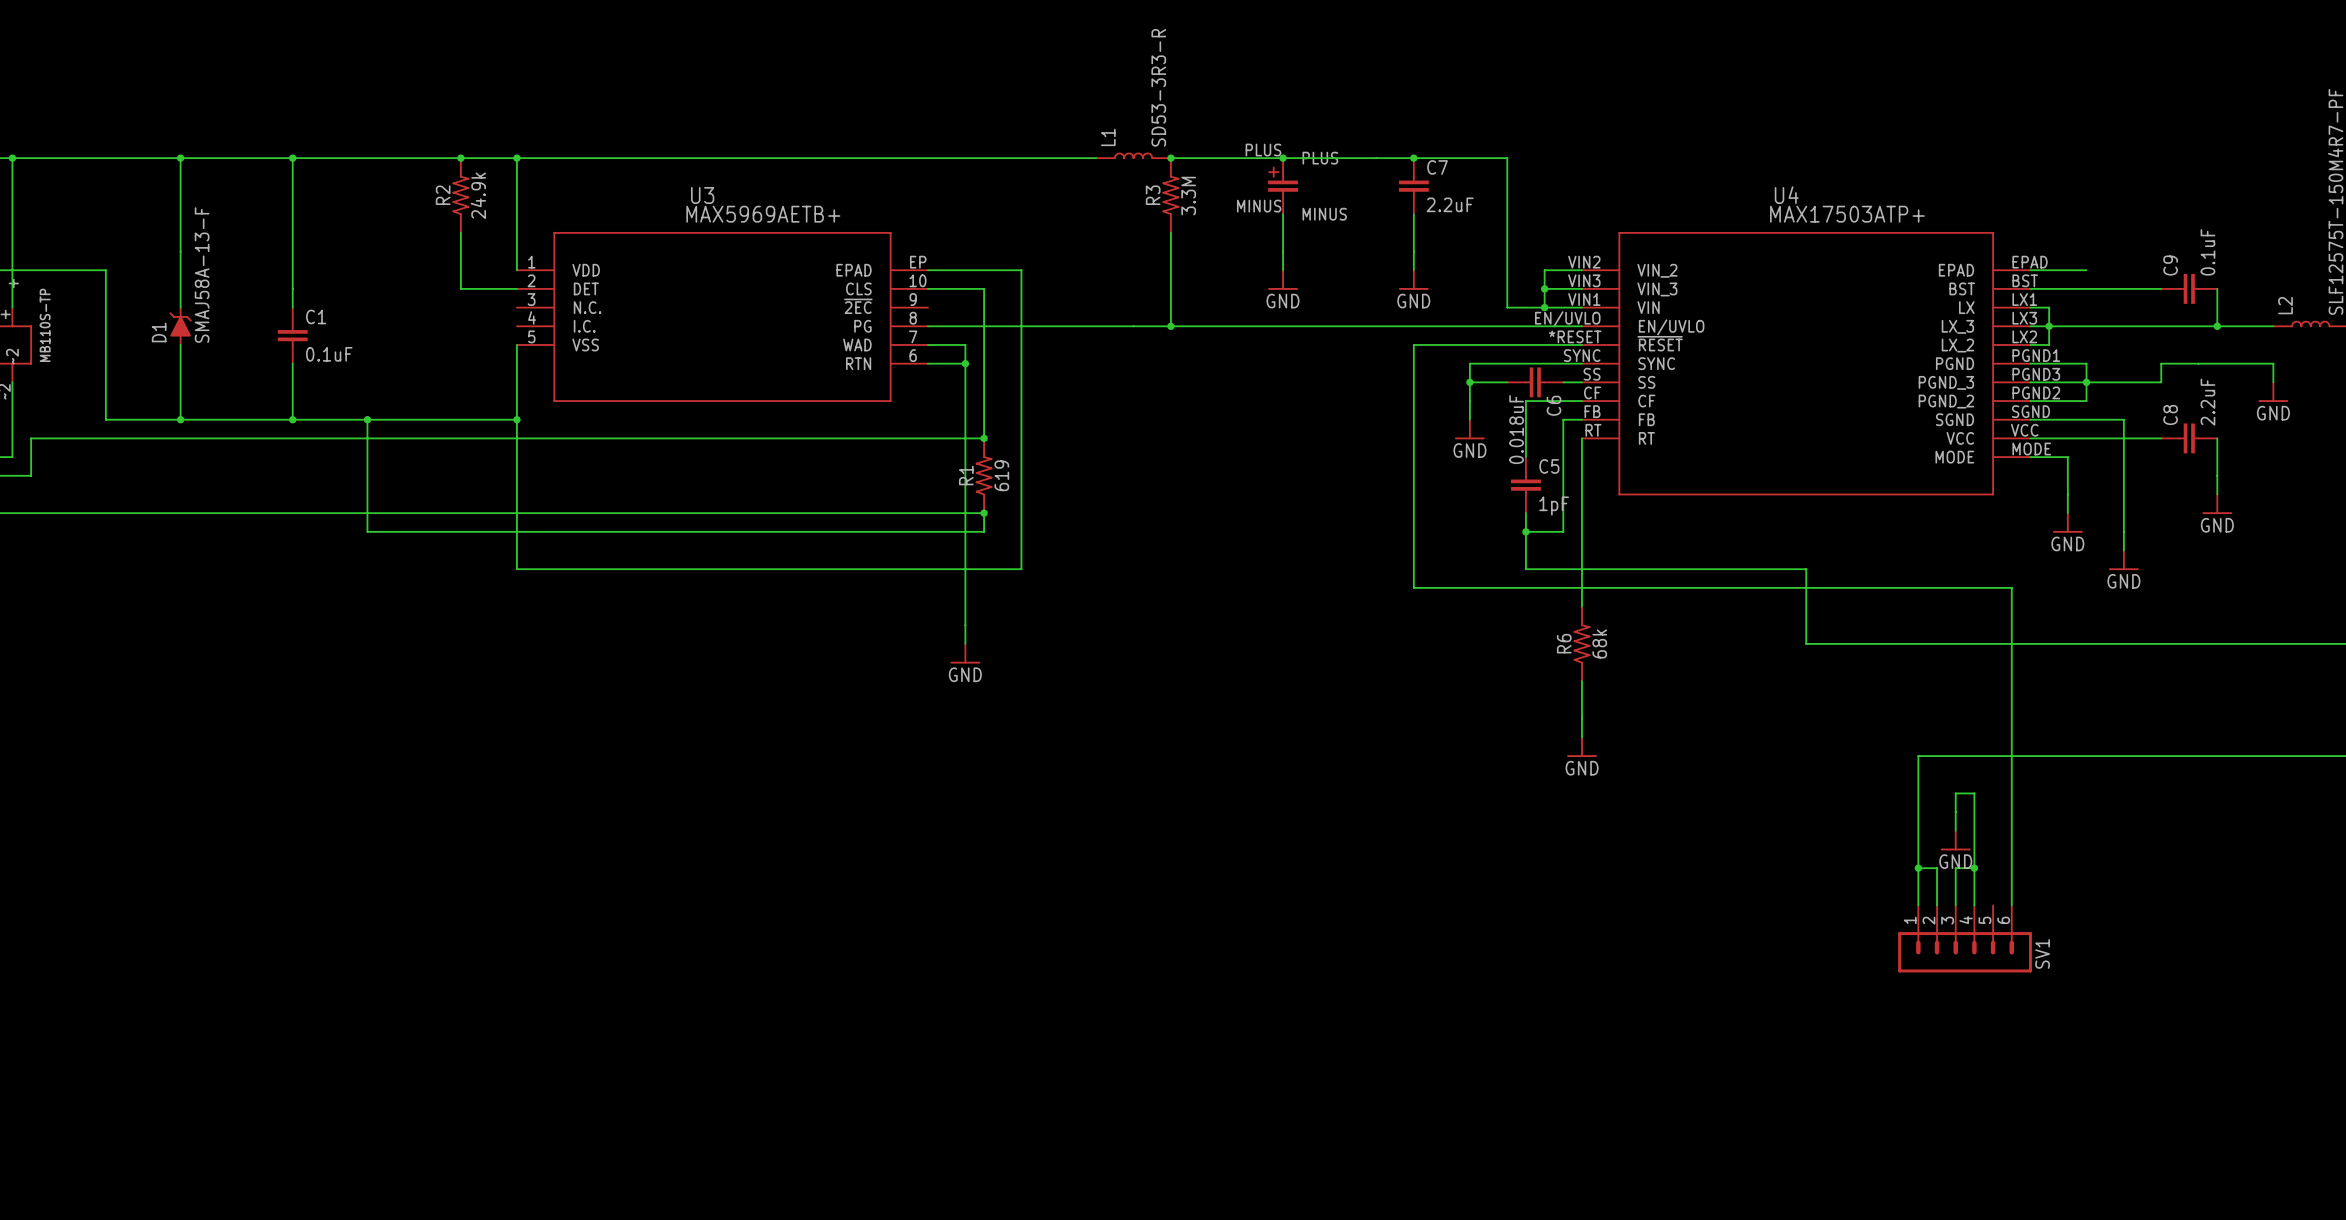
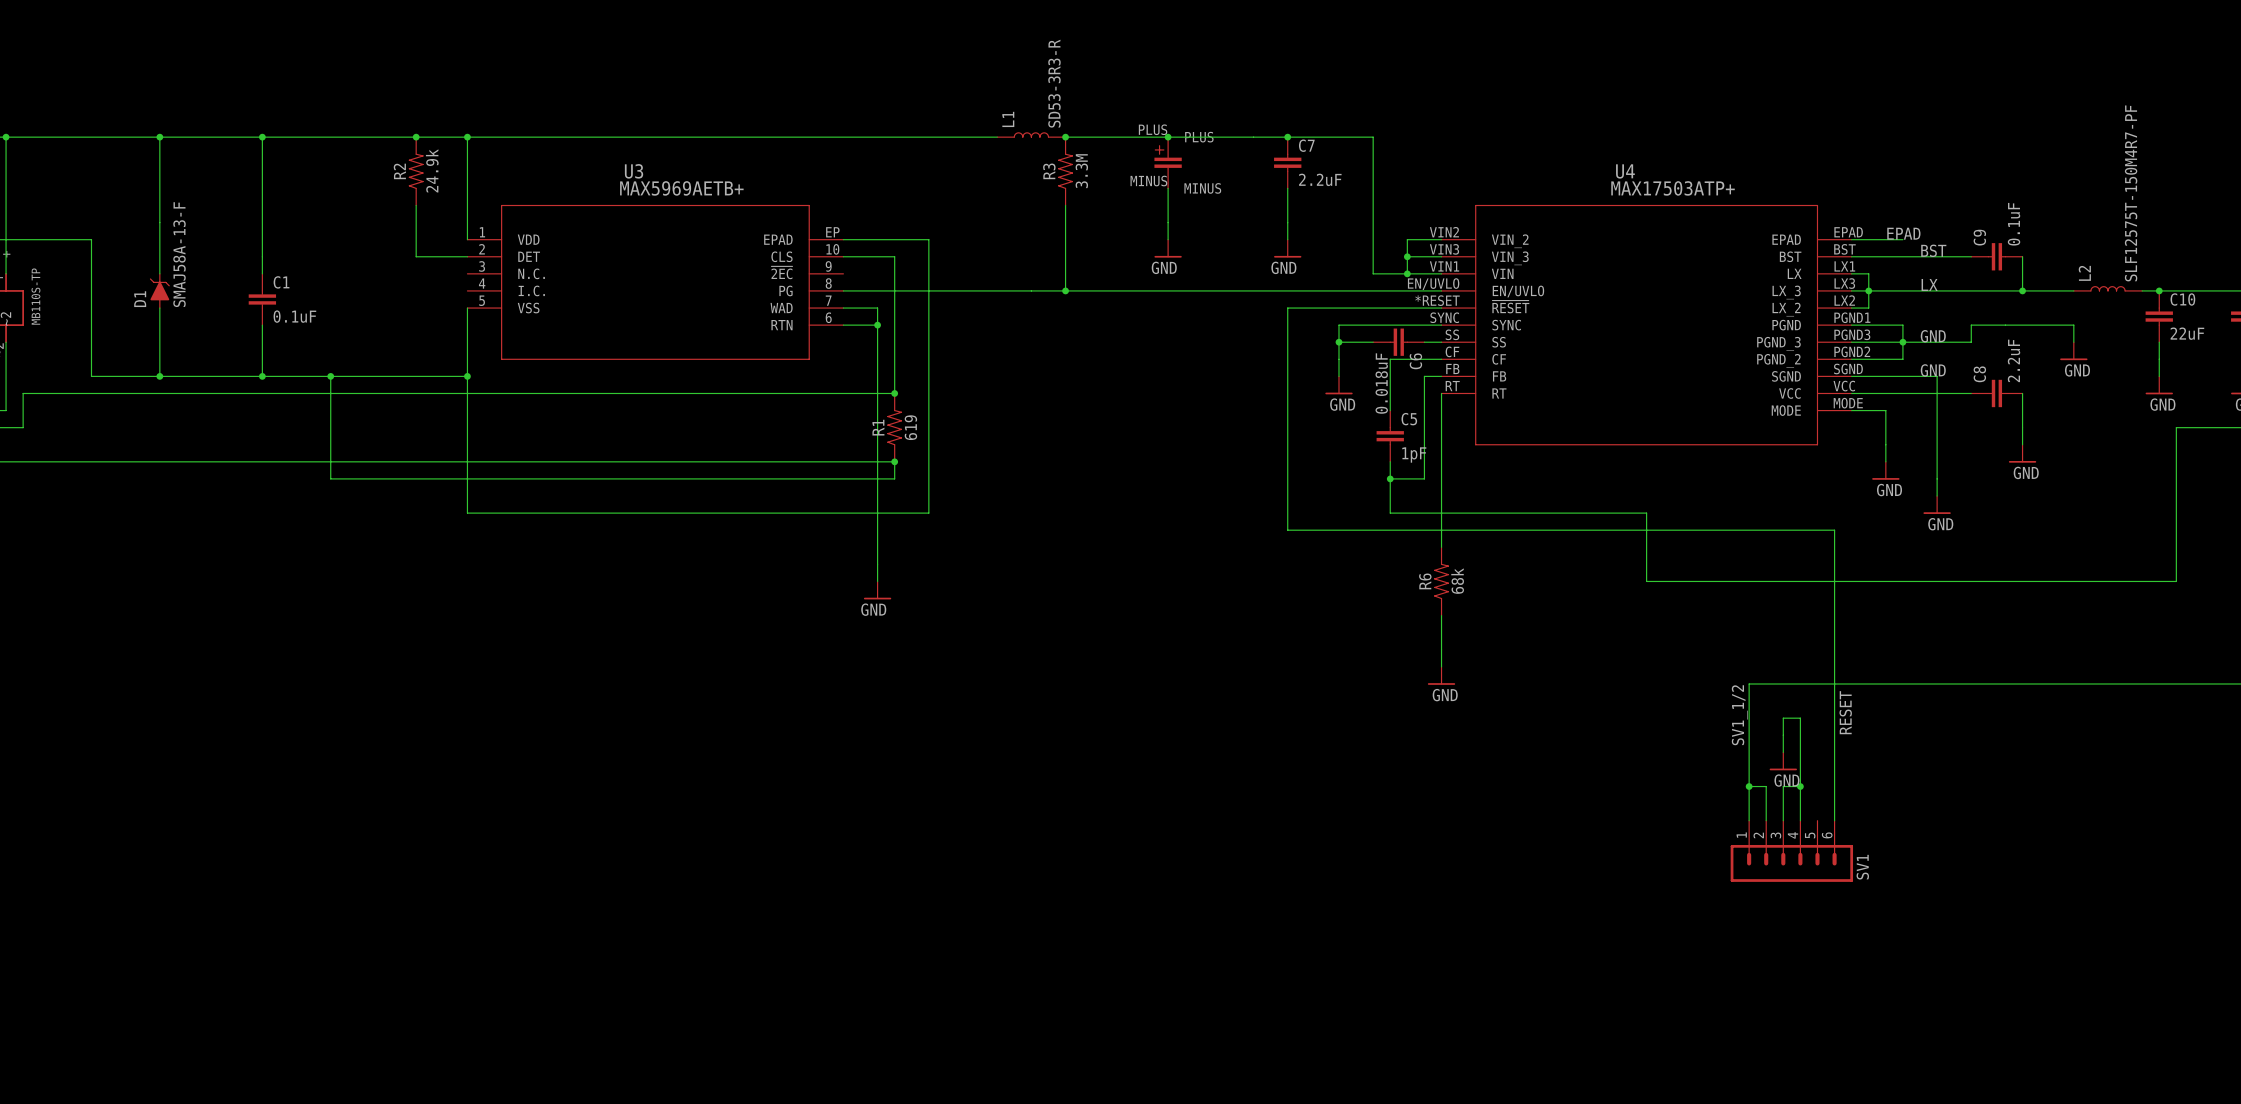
label: none -> EPAD (1903, 233)
label: none -> BST (1933, 250)
label: none -> LX (1929, 284)
label: none -> GND (1933, 336)
label: none -> GND (1933, 370)
label: none -> RESET (1845, 712)
label: none -> SV1_1/2 (1739, 715)

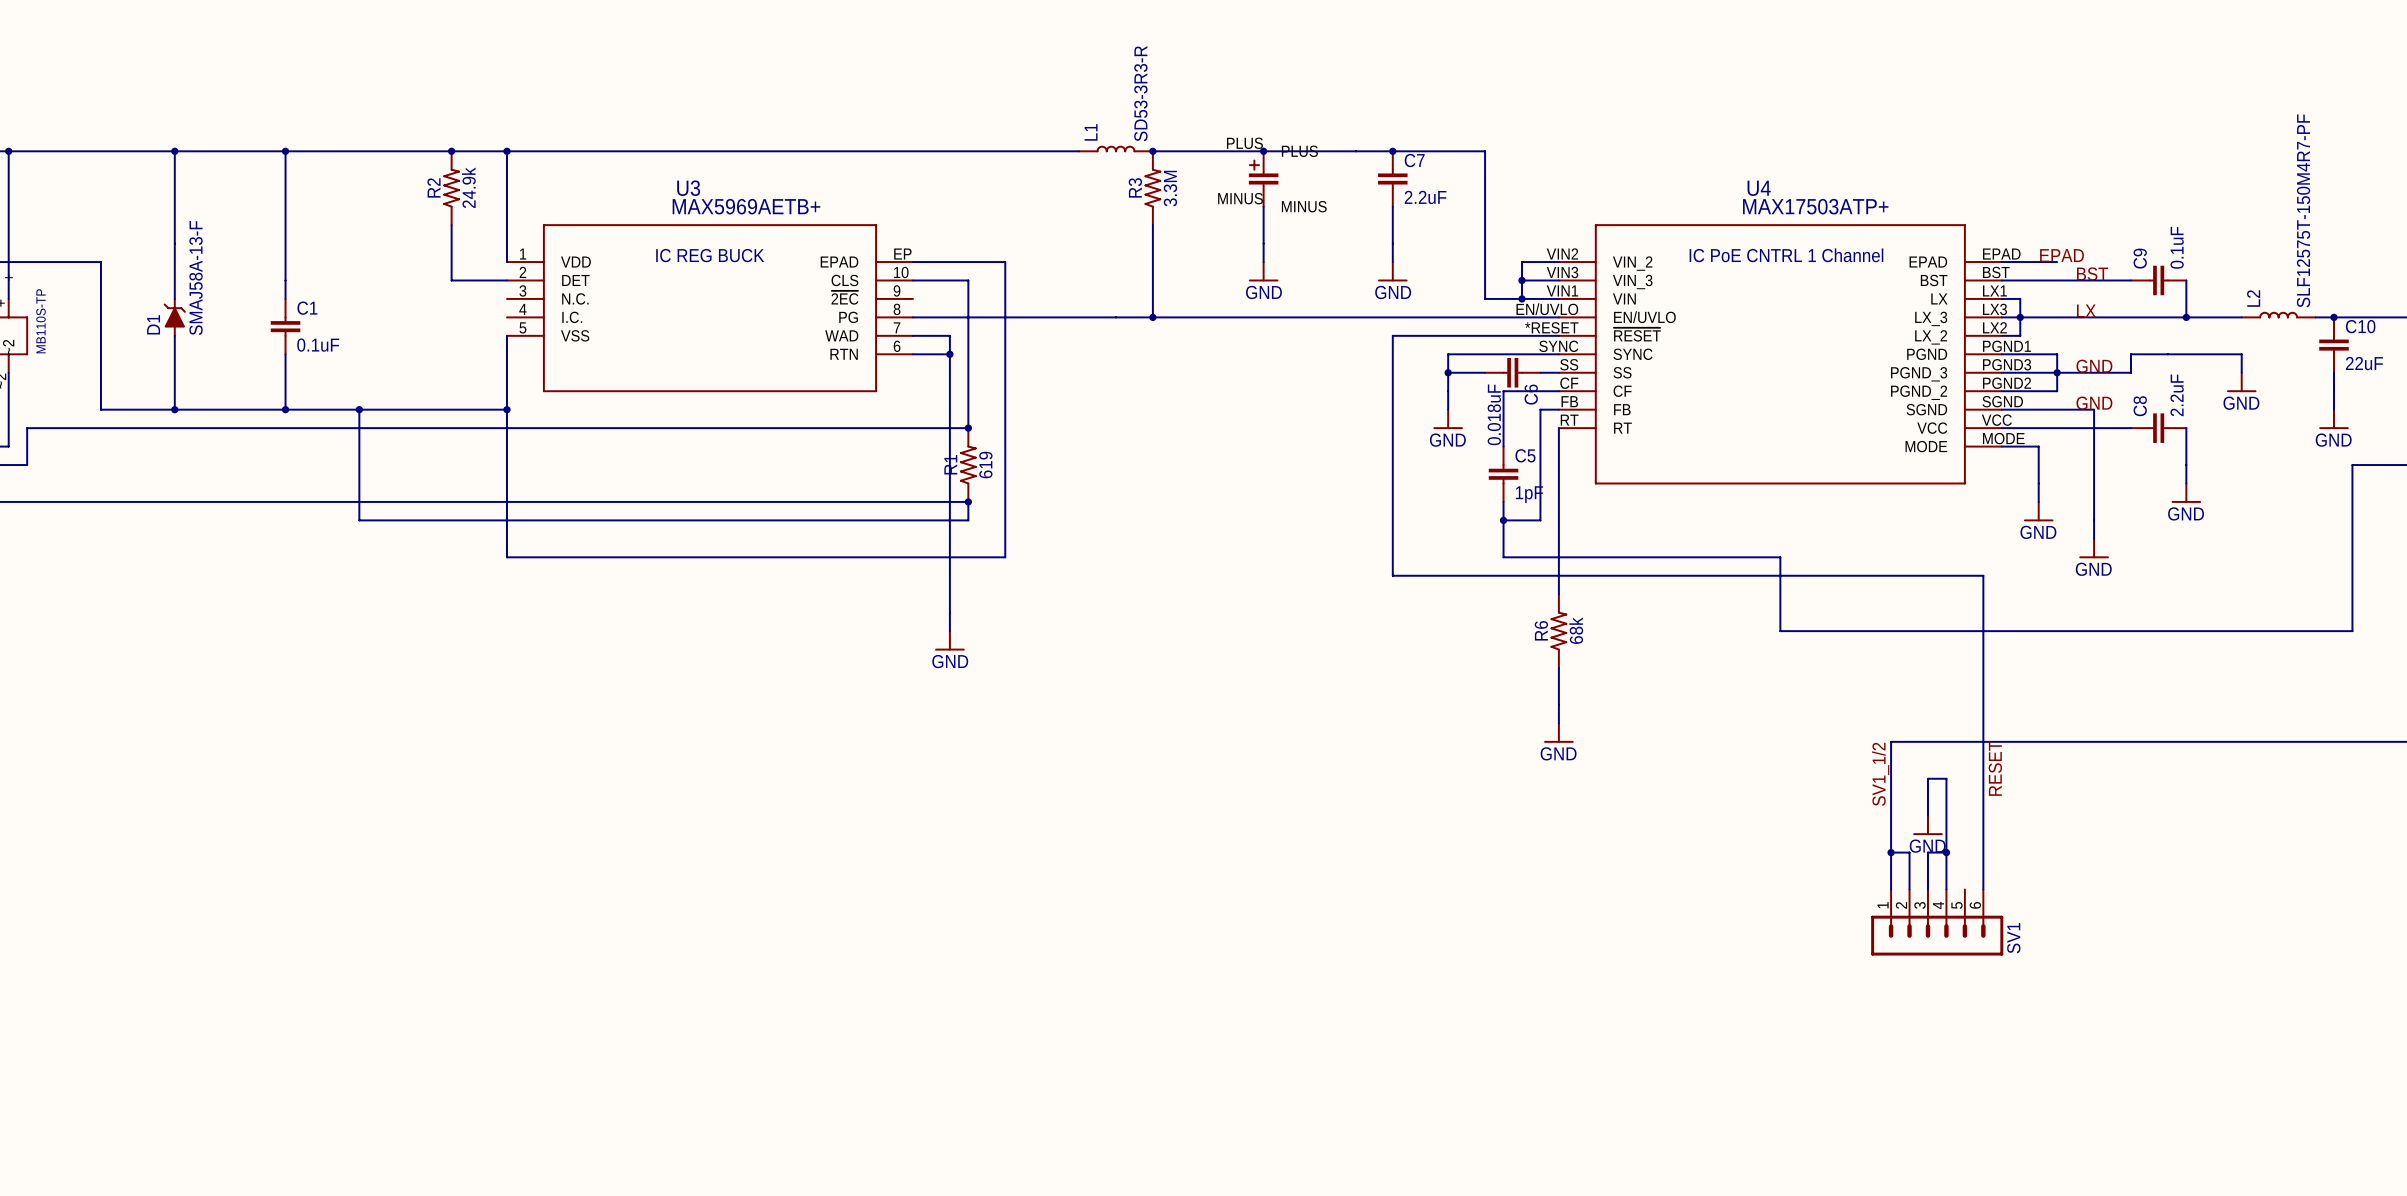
text: none -> IC REG BUCK (710, 255)
text: none -> IC PoE CNTRL 1 Channel (1786, 255)

